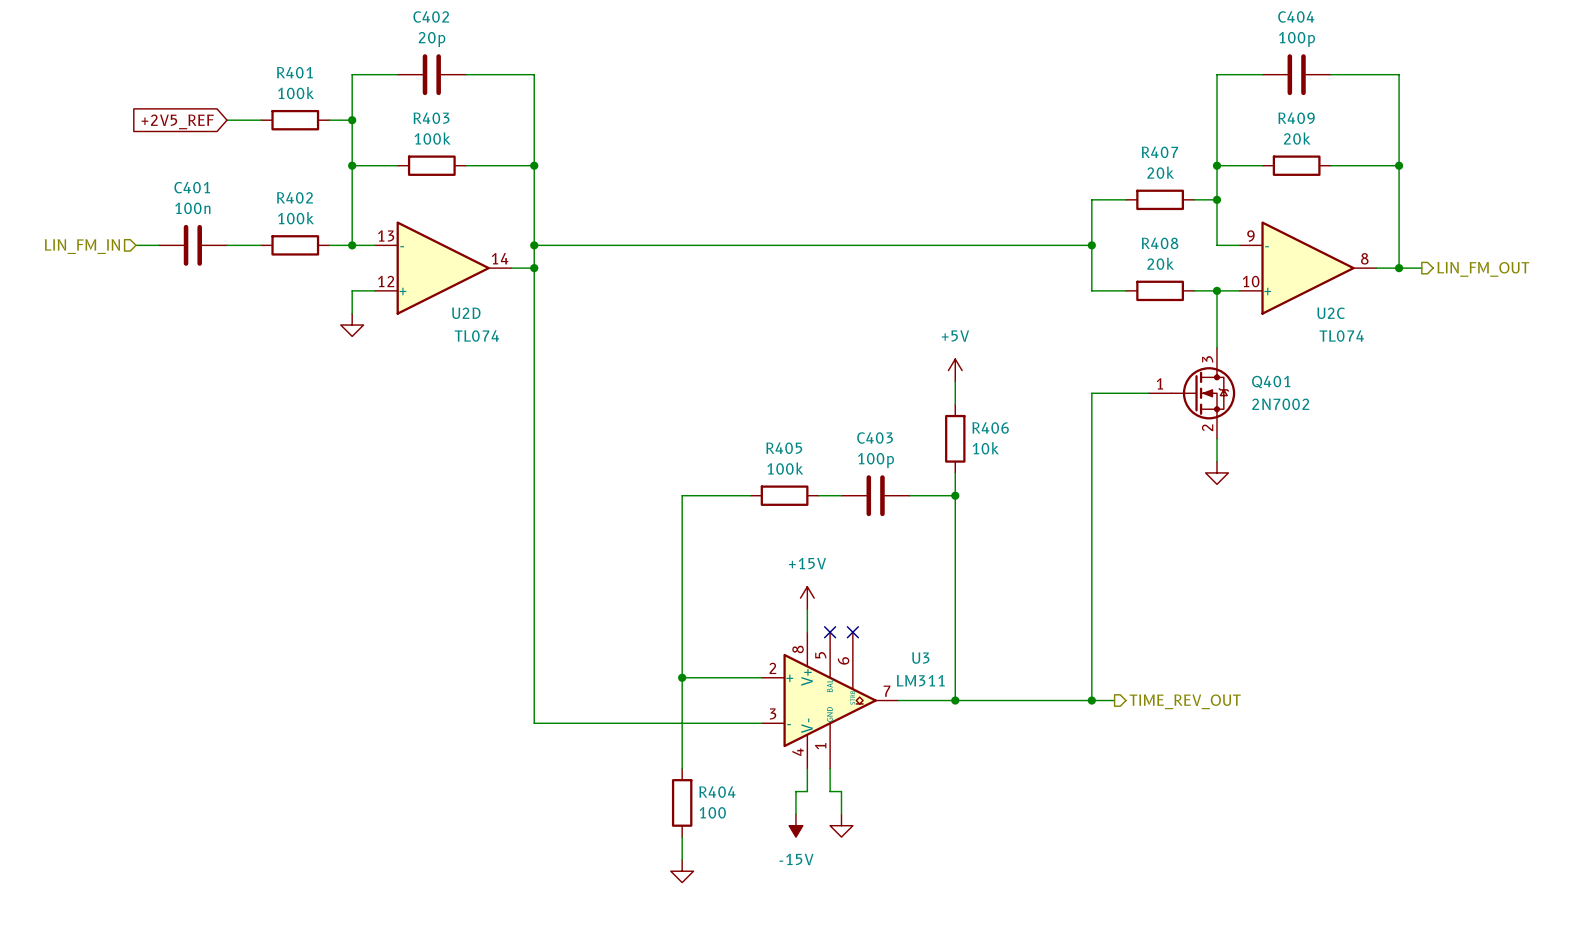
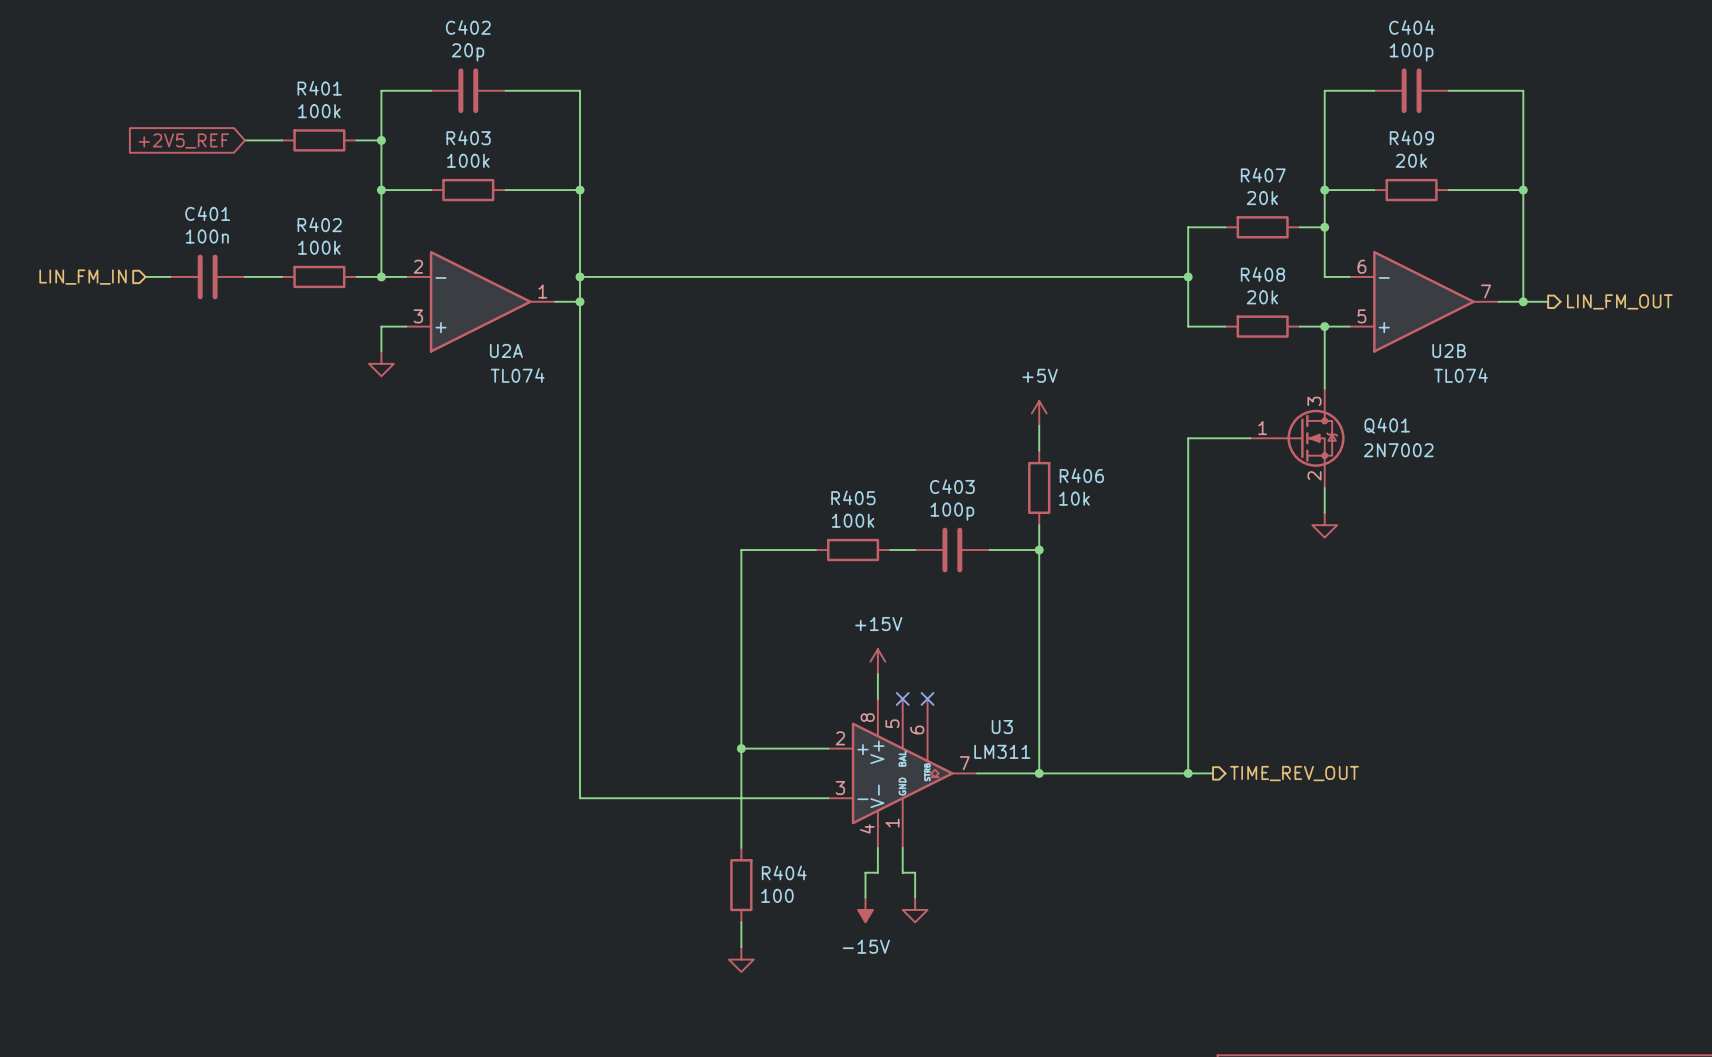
U2D pin number: 13 (386, 235) -> 2 (418, 266)
U2C pin number: 9 (1250, 236) -> 6 (1361, 266)
U2D pin number: 14 (500, 258) -> 1 (542, 291)
U2C pin number: 8 (1364, 258) -> 7 (1486, 291)
U2D pin number: 12 (386, 281) -> 3 (418, 316)
U2C pin number: 10 (1251, 281) -> 5 (1361, 316)
U2D name: U2D (466, 313) -> U2A (506, 350)
U2C name: U2C (1331, 313) -> U2B (1449, 350)

